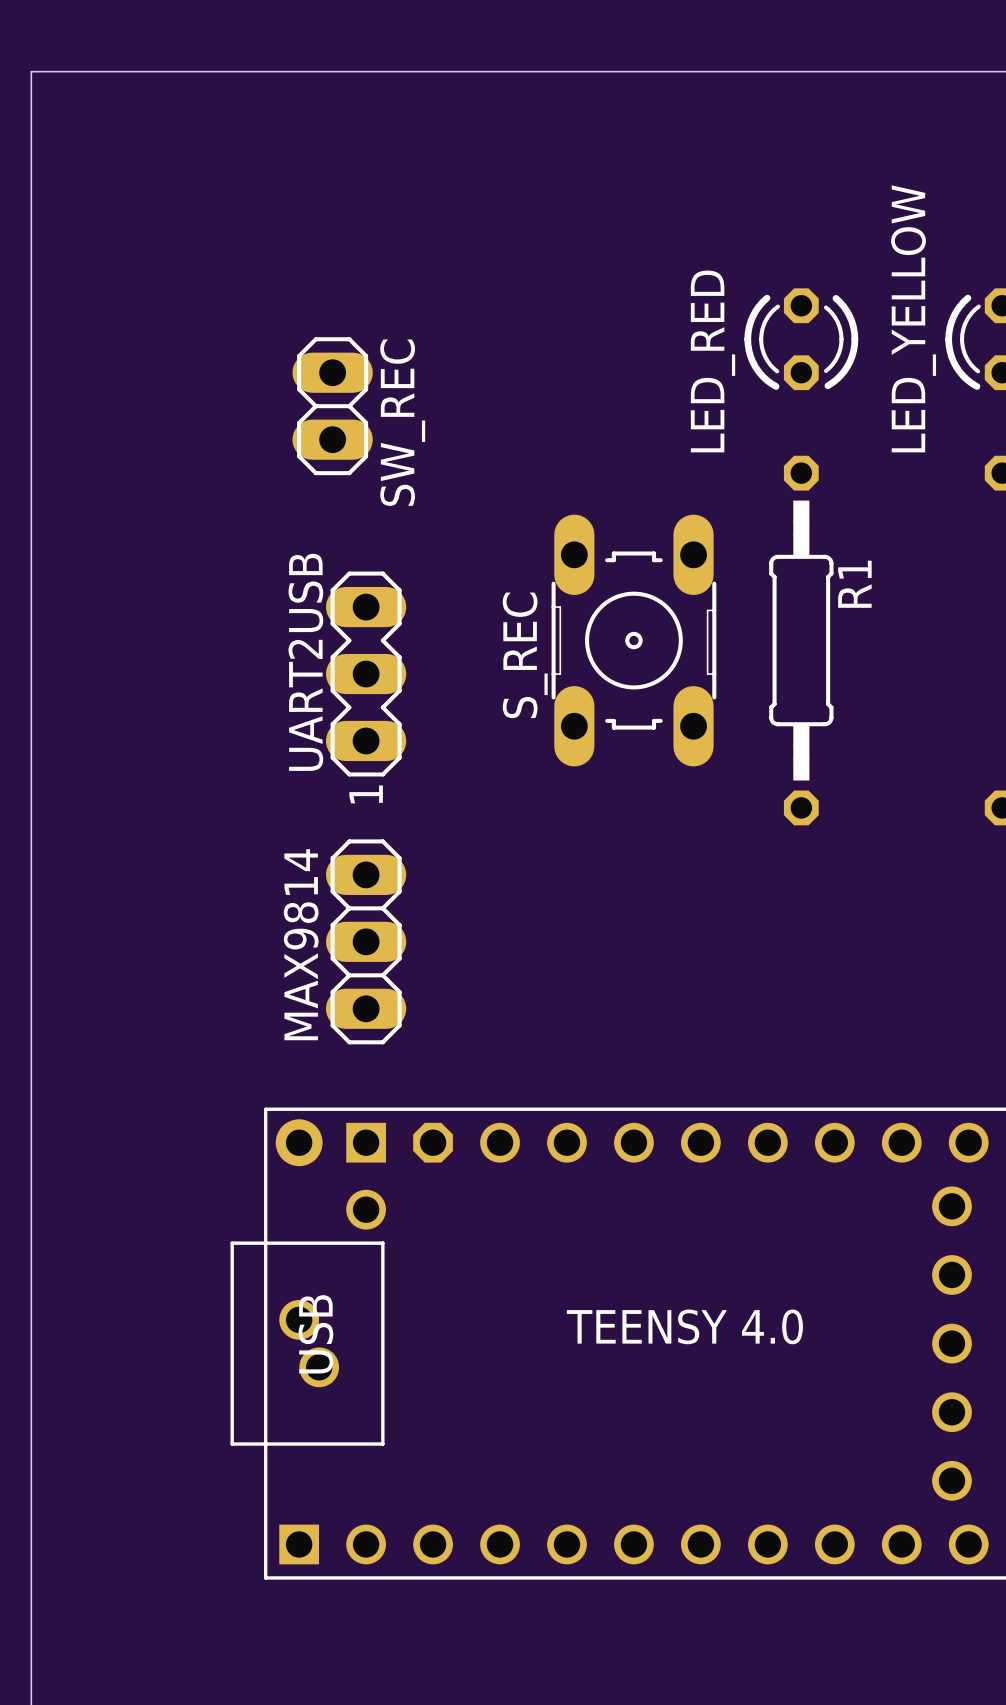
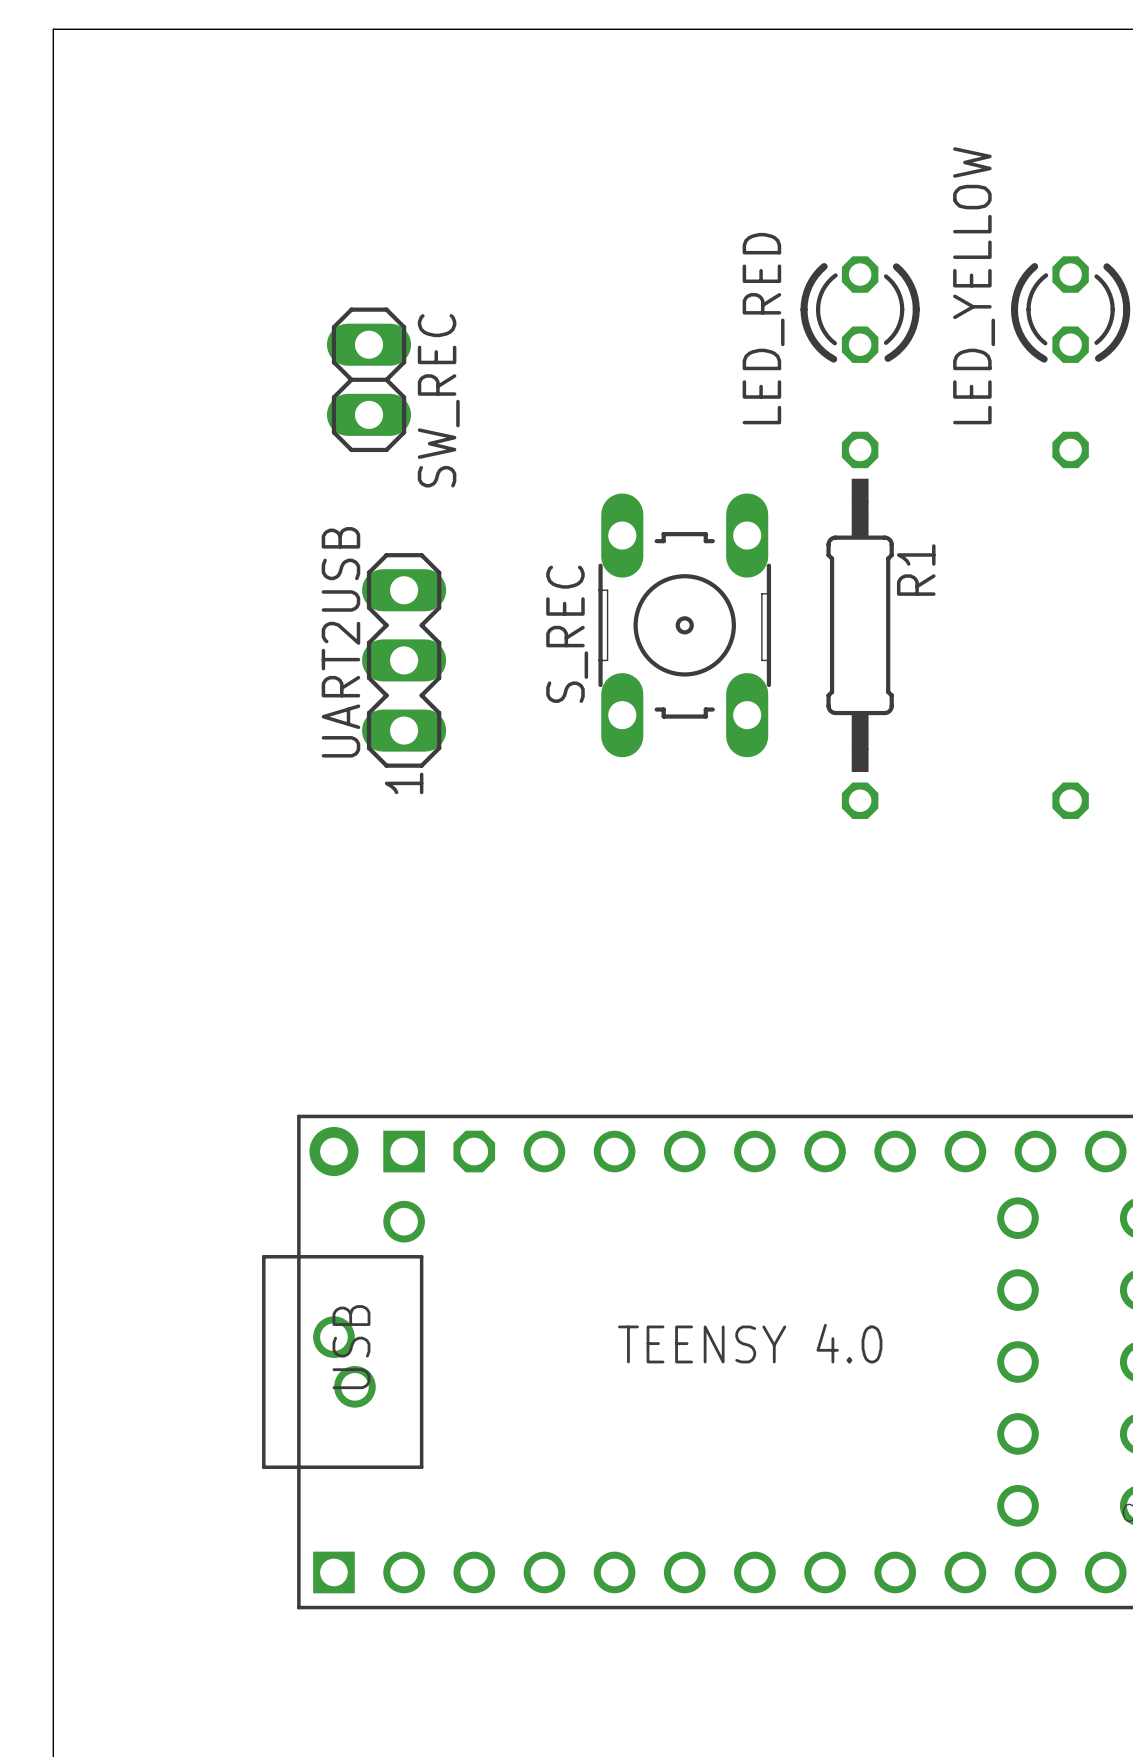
MAX9814: (366, 941) -> none

